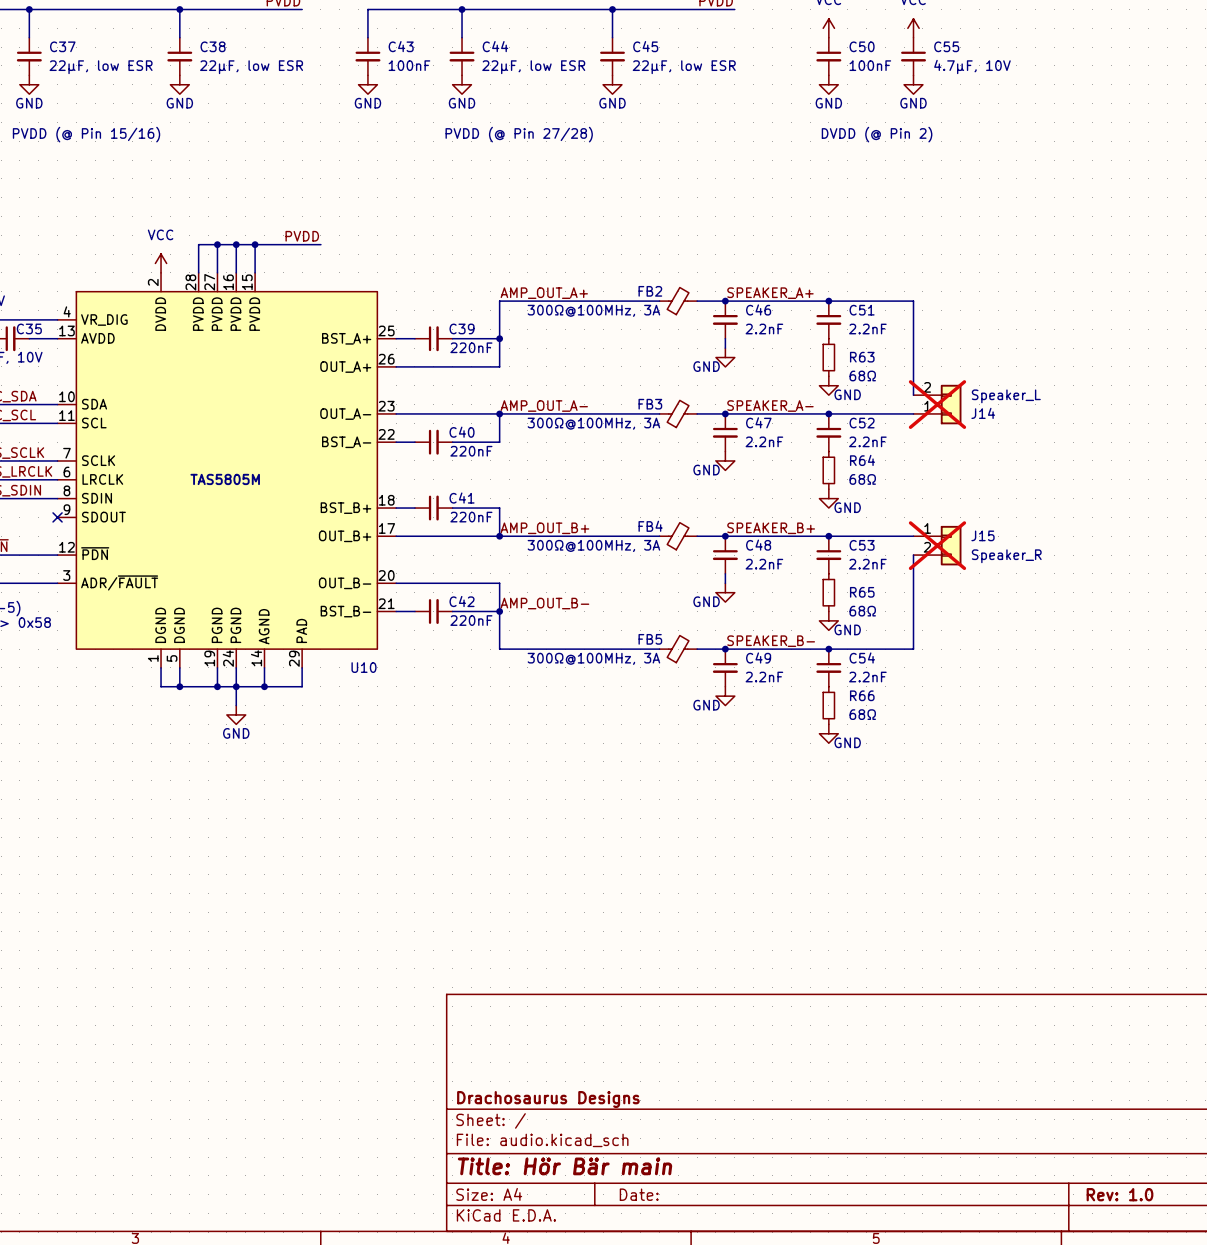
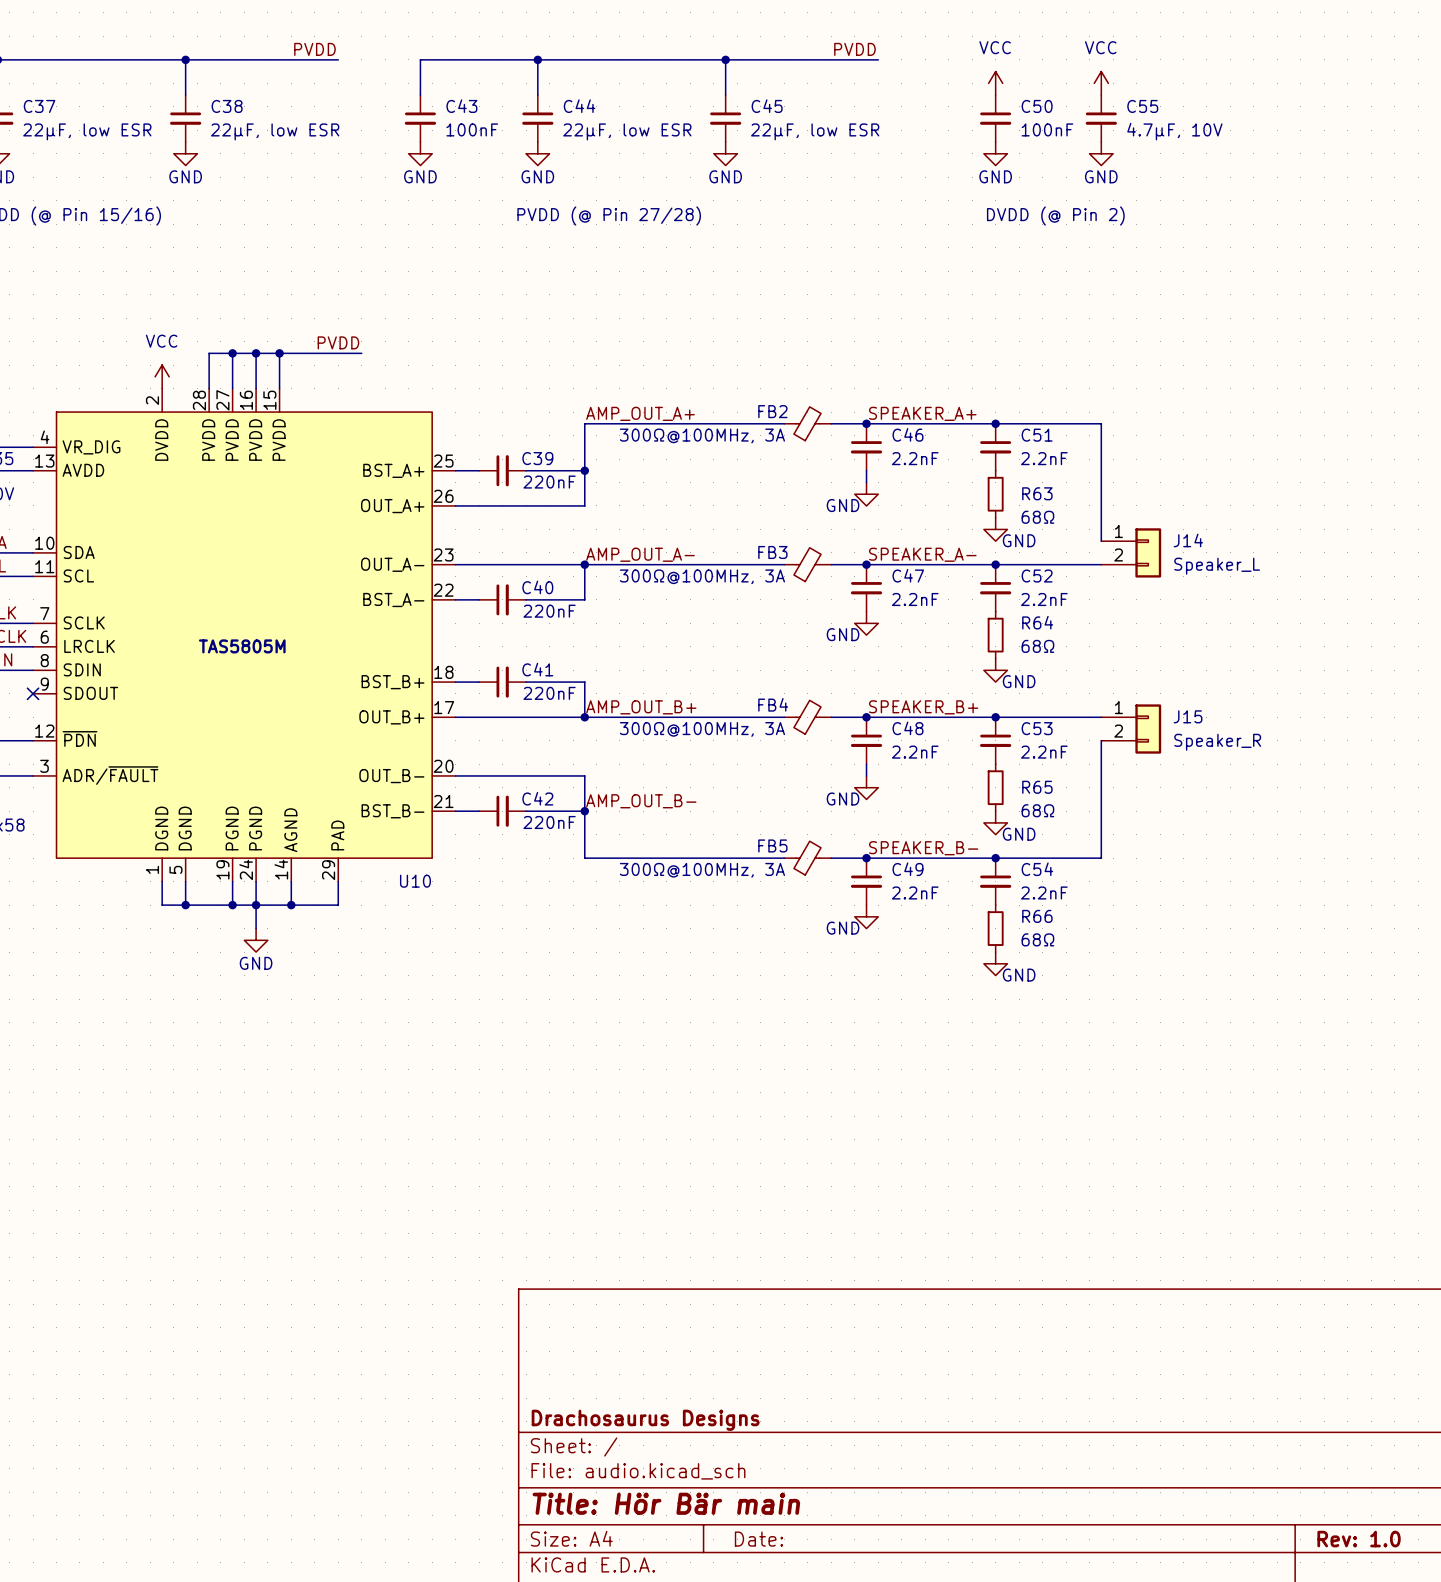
J14 do-not-place cross: (937, 404) -> none
J14 flip: as is (951, 404) -> up-down (1148, 552)
J15 do-not-place cross: (937, 545) -> none

